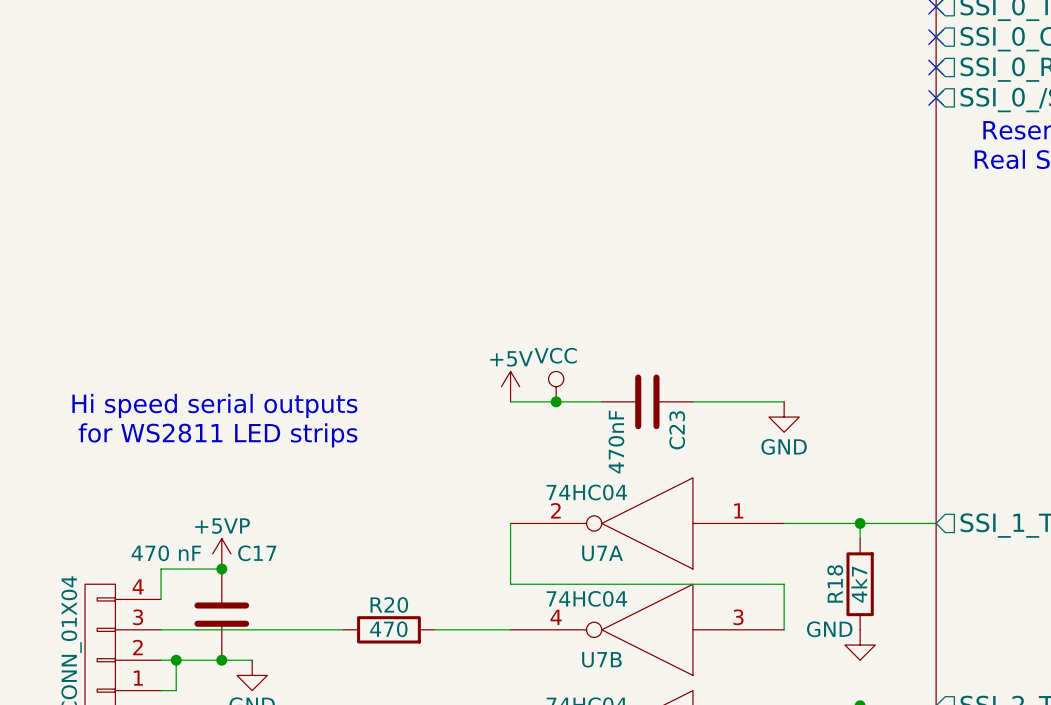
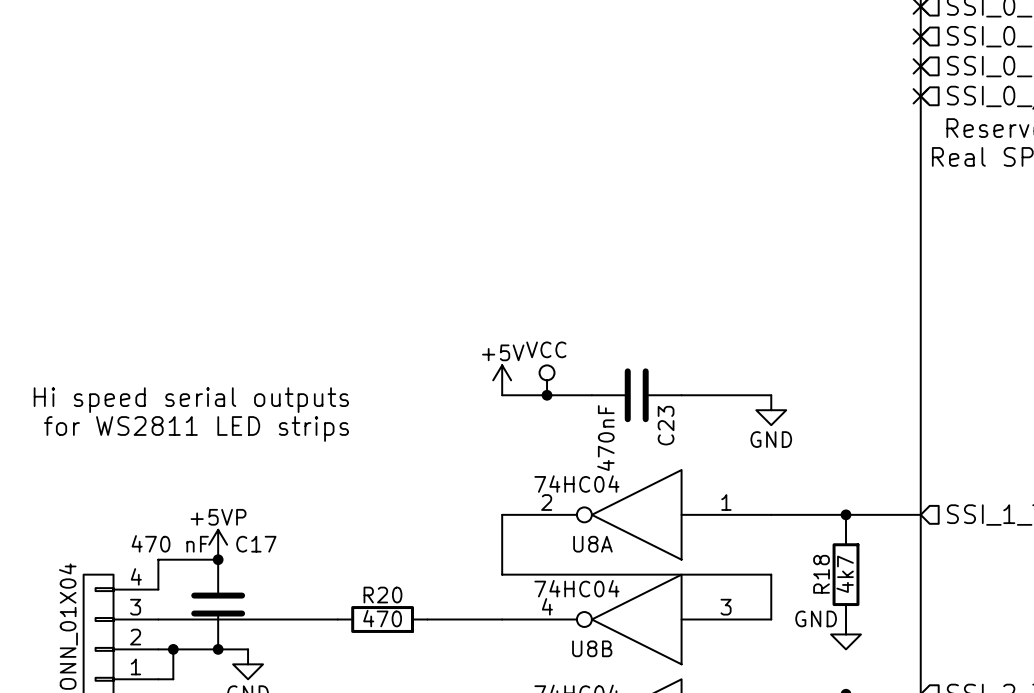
U7A name: U7A (602, 553) -> U8A (592, 544)
U7B name: U7B (601, 659) -> U8B (592, 648)

